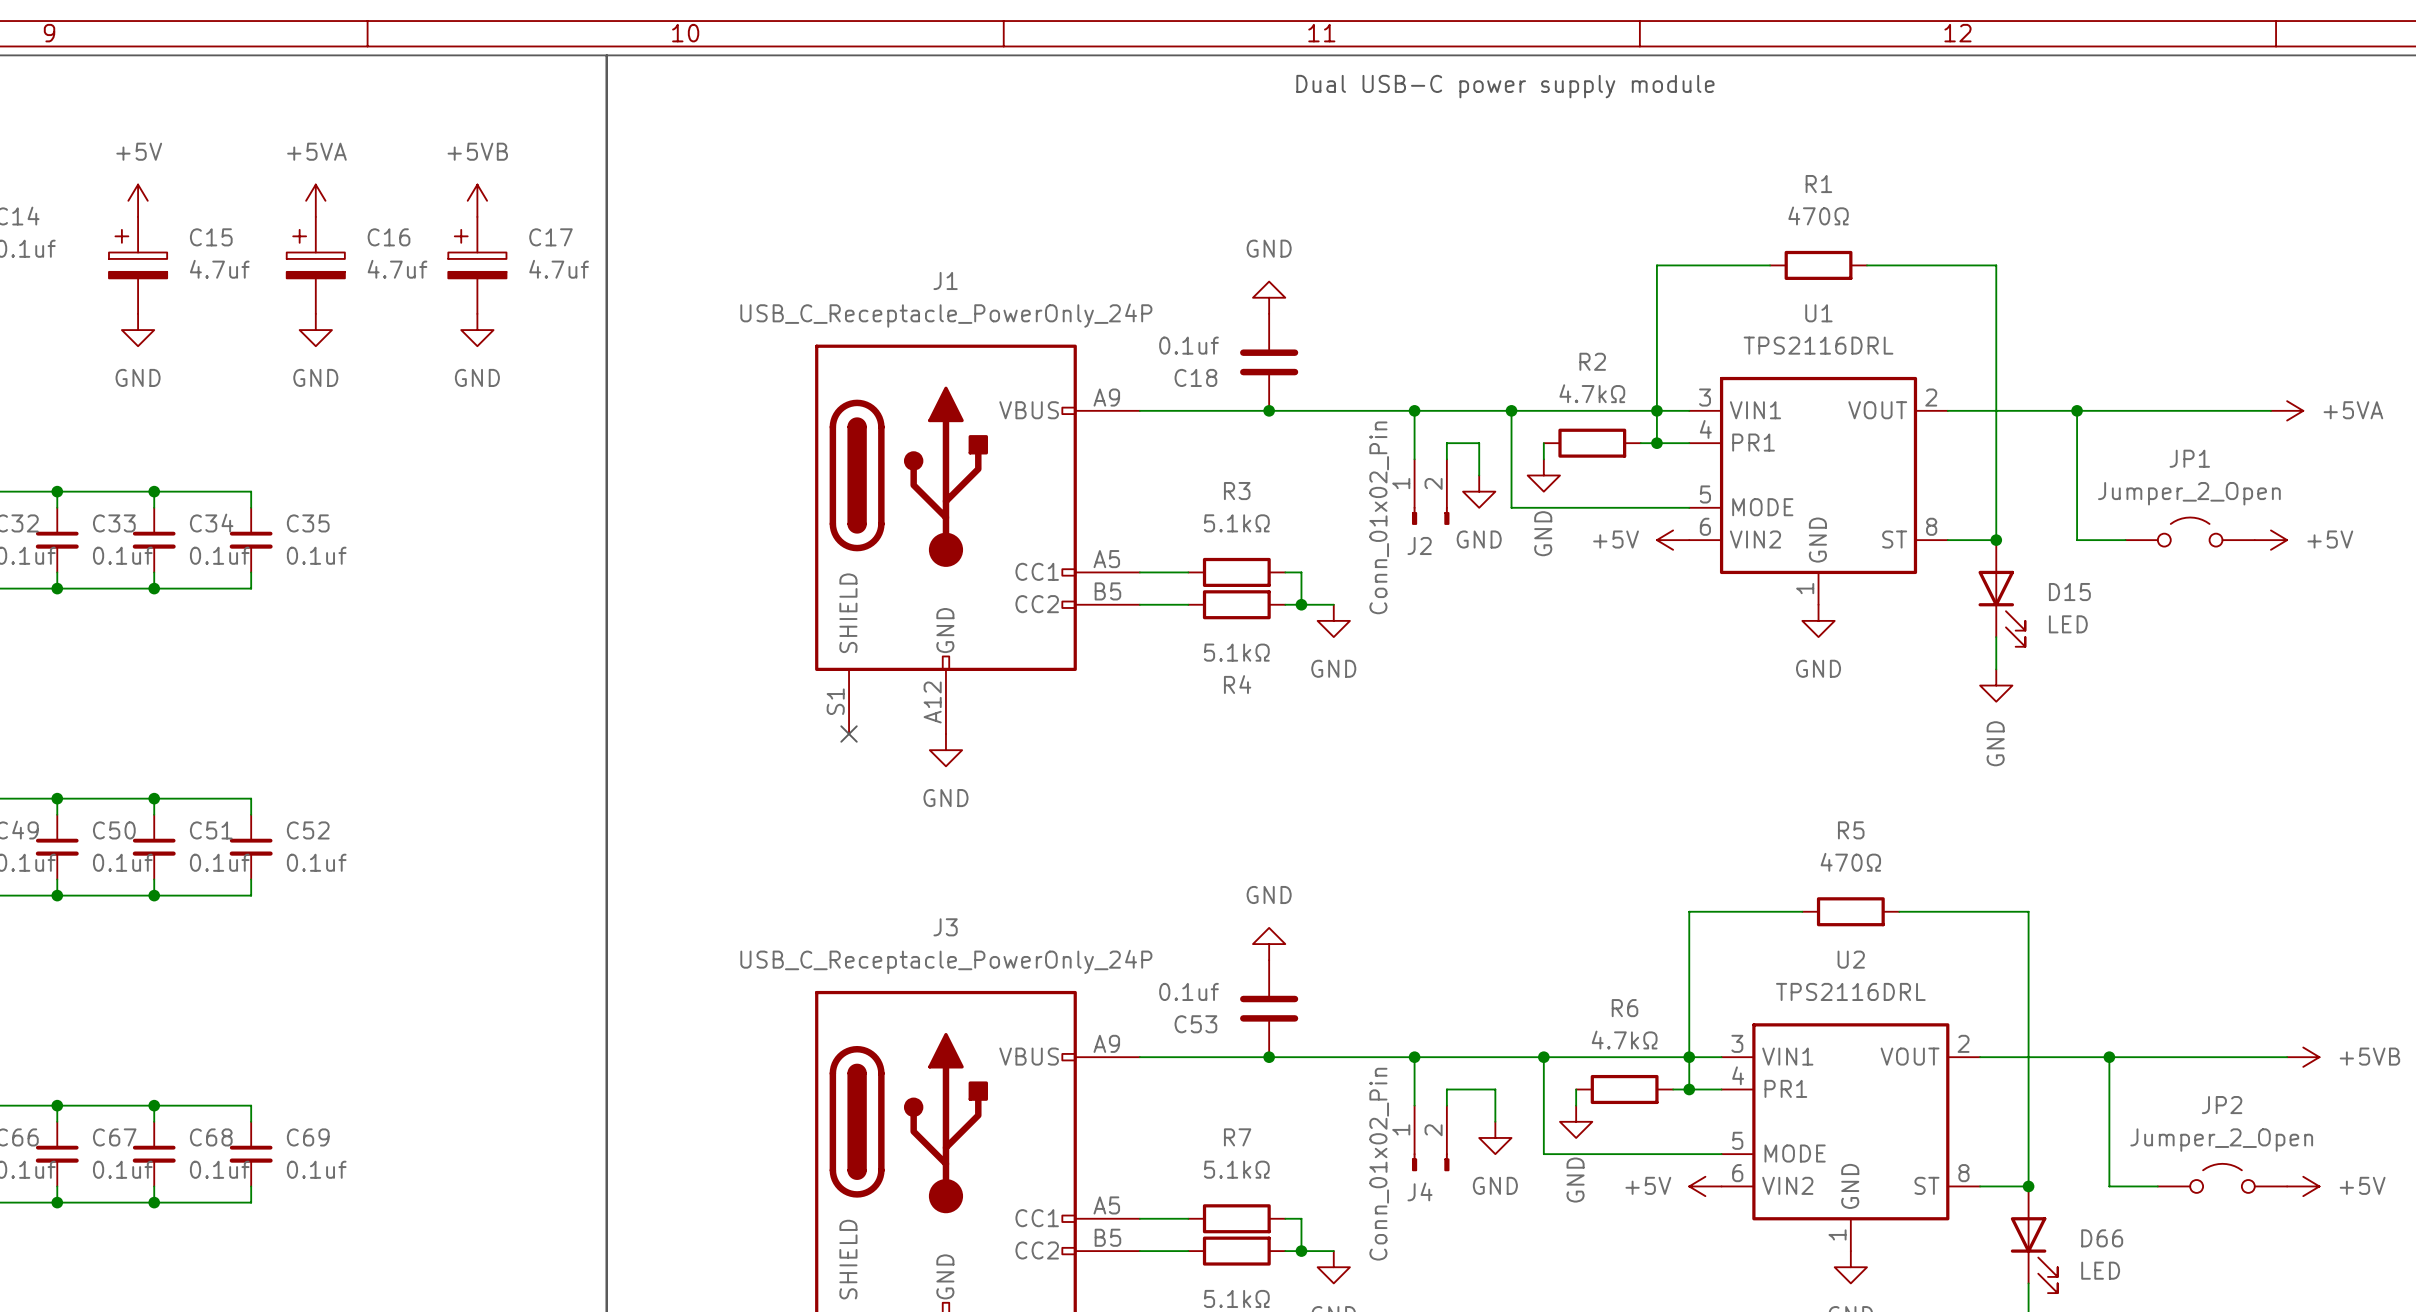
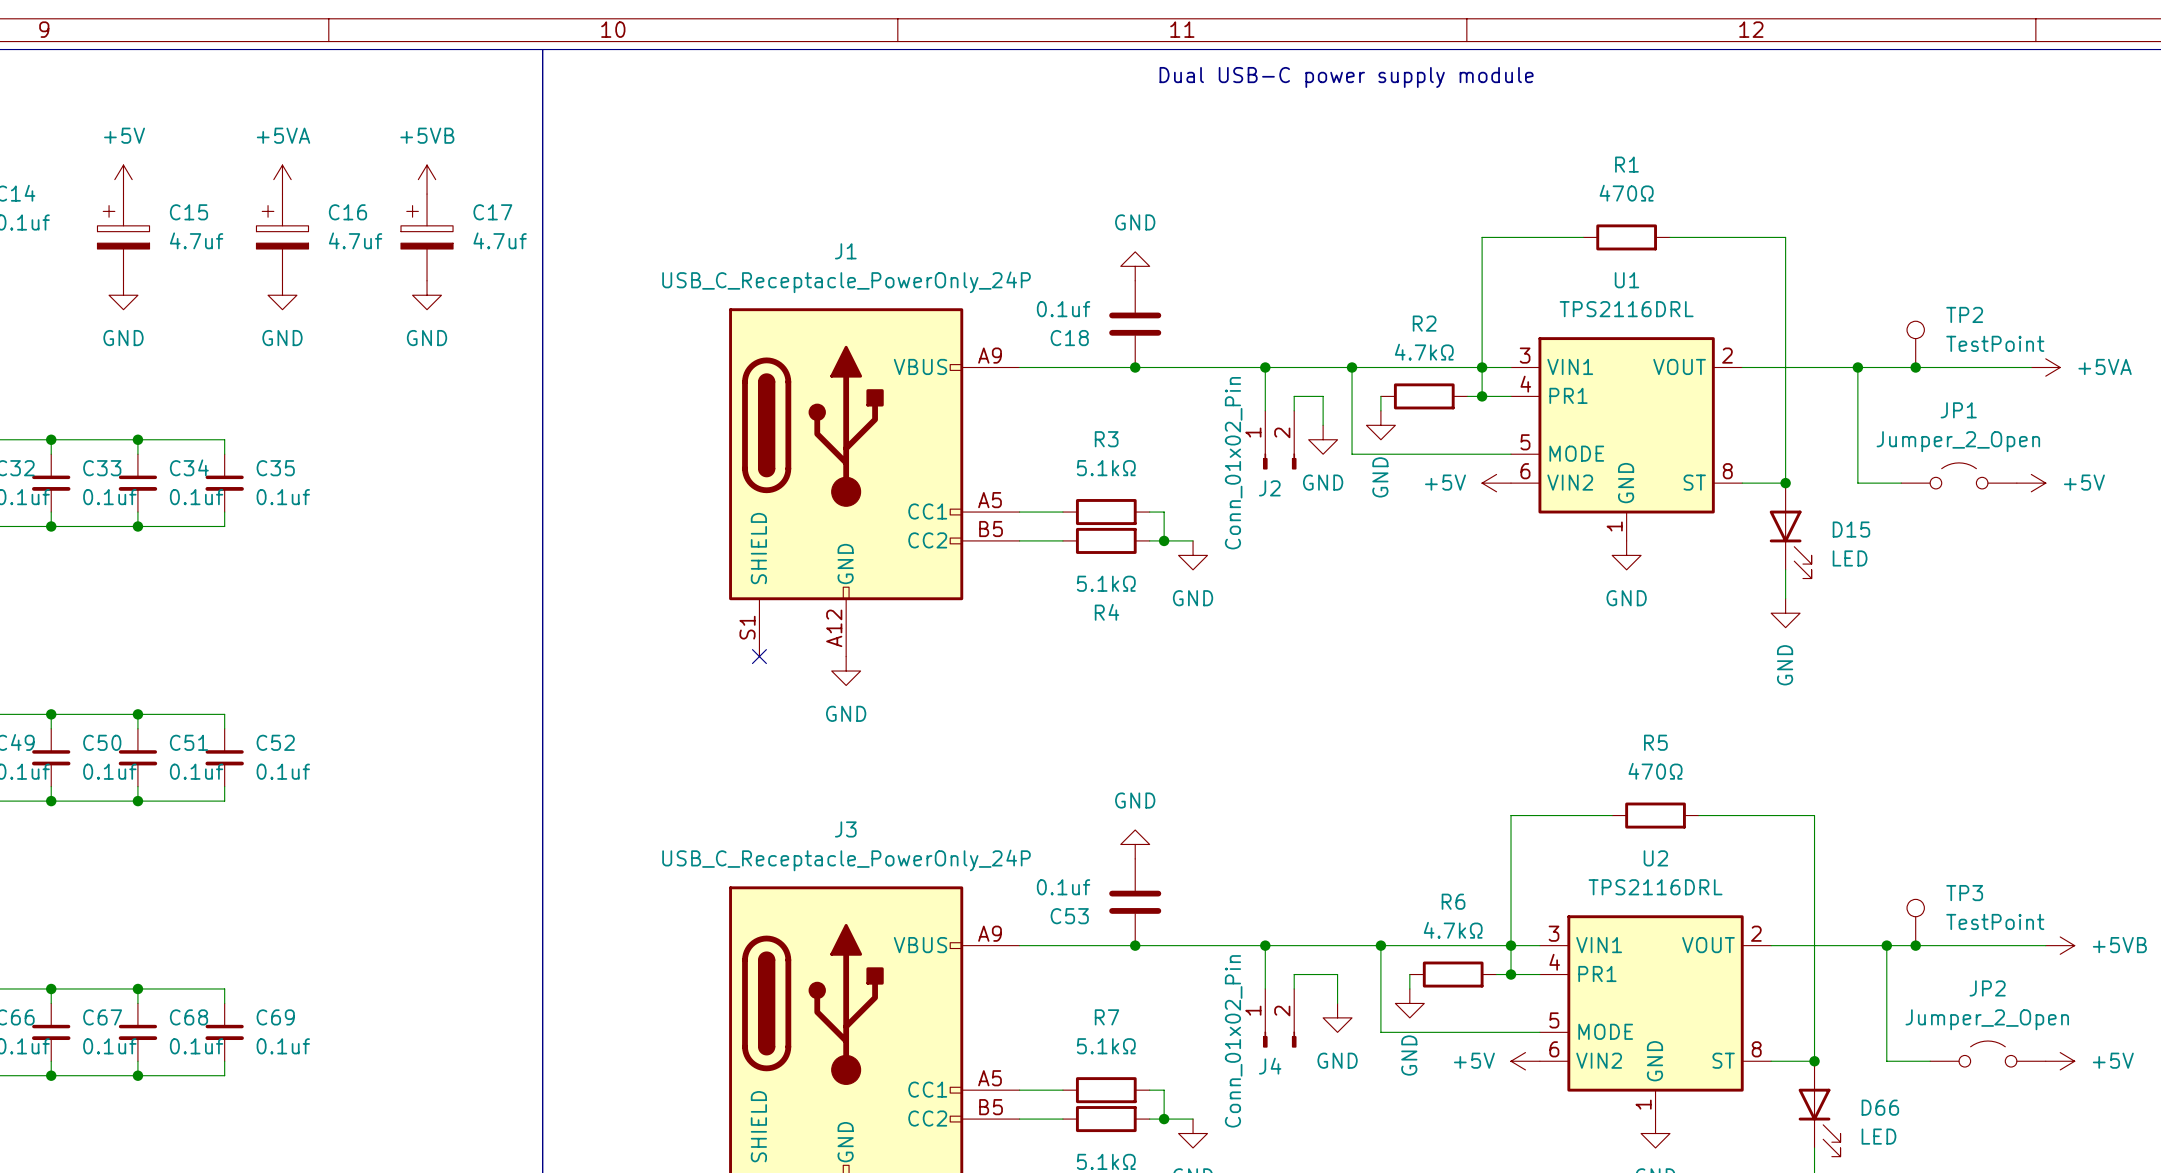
TP2: none -> TestPoint (1915, 344)
junction: none -> (1915, 367)
TP3: none -> TestPoint (1915, 922)
junction: none -> (1915, 945)

